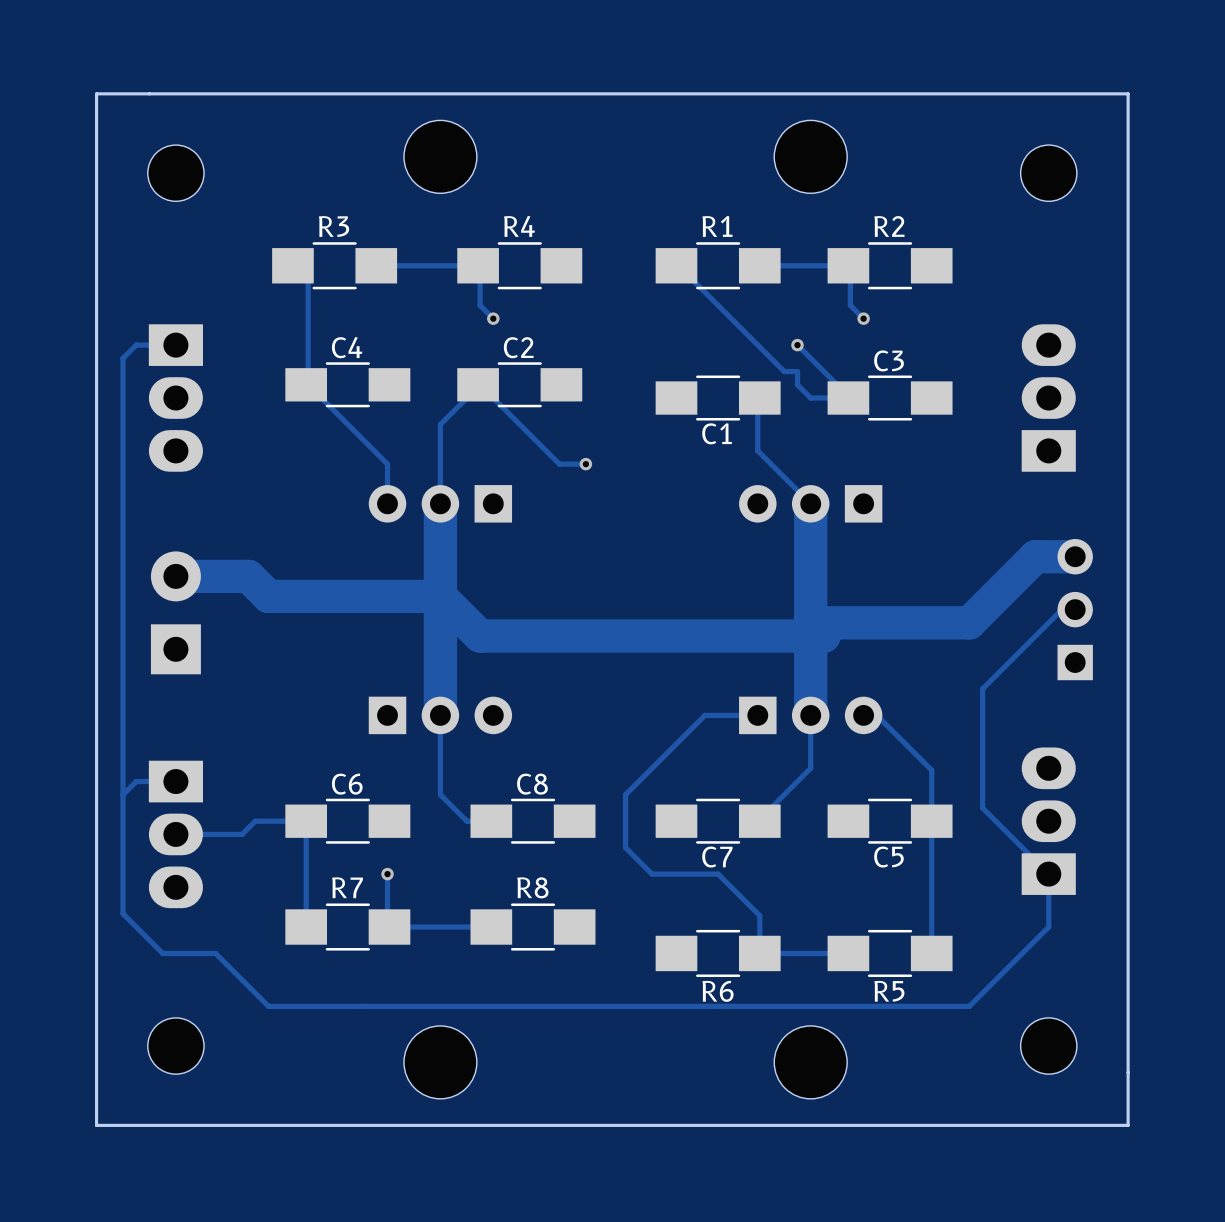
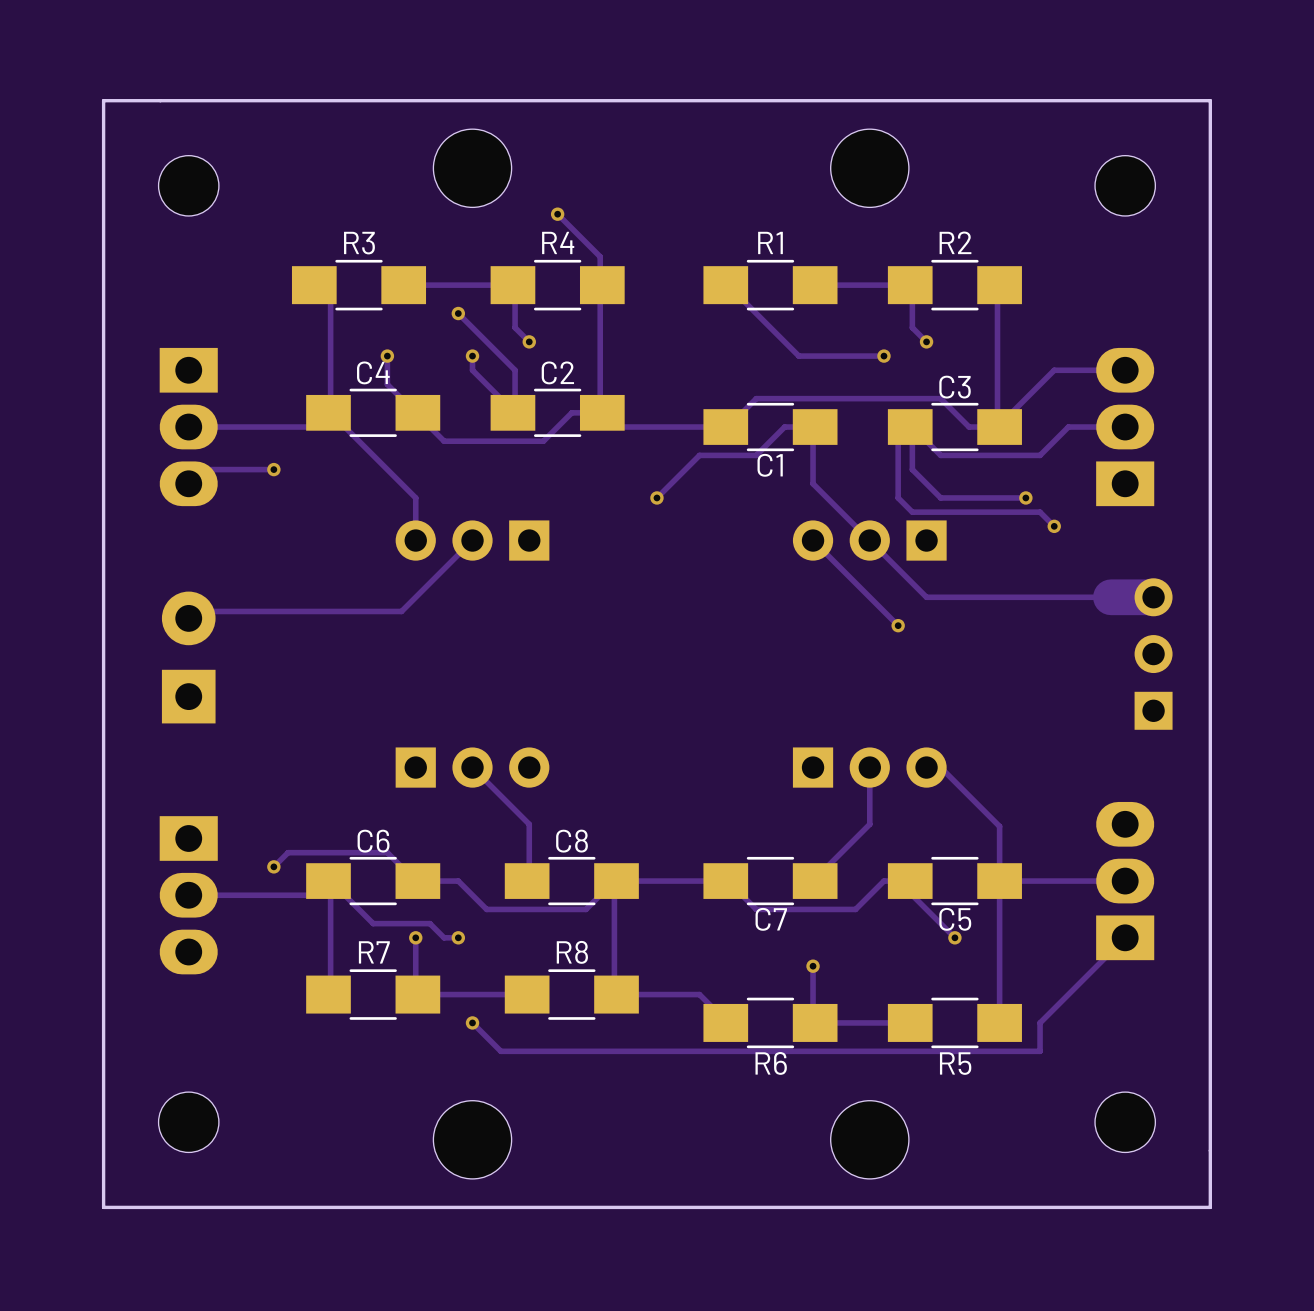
track: none -> (557, 214) (600, 256) (600, 412) (614, 427) (727, 427) (756, 398) (841, 398)
via: none -> (557, 214)
track: none -> (999, 285) (997, 285) (997, 427) (1054, 370) (1125, 370)
track: none -> (458, 313) (515, 370) (515, 412) (472, 370) (472, 356)
via: none -> (458, 313)
track: none -> (387, 356) (387, 384) (444, 441) (543, 441) (571, 412) (602, 412)
via: none -> (387, 356)
via: none -> (472, 356)
track: (744, 331) (784, 371) -> (798, 356) (883, 356)
track: (175, 345) (136, 345) (123, 358) (123, 913) (162, 953) (215, 953) (268, 1006) (969, 1006) (1048, 927) (1048, 874) (982, 807) (982, 688) (1061, 609) (1075, 609) -> none
track: (797, 345) (850, 398) -> (1025, 497) (940, 497) (912, 469) (912, 427)
via position: (797, 345) -> (883, 356)
track: (797, 371) (797, 384) (810, 398) (848, 398) -> (855, 398) (940, 398) (969, 427) (999, 427)
track: none -> (330, 412) (316, 427) (188, 427)
track: none -> (813, 427) (784, 427) (756, 455) (699, 455) (656, 497)
track: none -> (912, 427) (898, 441) (898, 497) (912, 512) (1040, 512) (1054, 526)
track: none -> (1125, 427) (1068, 427) (1040, 455) (940, 455) (912, 427)
track: none -> (273, 469) (202, 469) (188, 483)
via: none -> (273, 469)
track: (585, 464) (559, 464) (480, 384) (440, 424) (440, 794) (466, 821) (491, 821) -> (472, 767) (529, 824) (529, 881) (527, 881)
via position: (585, 464) -> (656, 497)
via: none -> (1025, 497)
via: none -> (1054, 526)
track: none -> (813, 540) (898, 625)
track: (810, 503) (810, 715) -> (869, 540) (926, 597) (1111, 597)
track: (1035, 556) (969, 622) (810, 622) (823, 636) (480, 636) (440, 596) (268, 596) (248, 576) (175, 576) -> (472, 540) (401, 611) (188, 611) (188, 618)
via: none -> (898, 625)
track: (757, 715) (704, 715) (625, 794) (625, 847) (652, 874) (718, 874) (759, 915) (759, 953) -> (813, 966) (813, 1022) (815, 1022)
track: (175, 781) (136, 781) (123, 794) -> none
track: none -> (273, 866) (288, 852) (387, 852) (415, 881) (458, 881) (486, 909) (586, 909) (614, 881)
via: none -> (273, 866)
track: none -> (330, 881) (316, 895) (259, 895)
track: none -> (330, 881) (373, 923) (429, 923) (444, 937) (458, 937)
track: none -> (614, 881) (727, 881) (756, 909) (855, 909) (883, 881) (912, 881) (912, 895) (954, 937)
track: none -> (614, 881) (614, 994) (699, 994) (727, 1022) (725, 1022)
track: none -> (1125, 881) (997, 881)
track: (242, 834) (255, 821) (306, 821) (306, 927) -> (330, 881) (330, 994) (328, 994)
via: none -> (458, 937)
via: none -> (954, 937)
track: none -> (1125, 937) (1040, 1022) (1040, 1051) (500, 1051) (472, 1022)
via: none -> (813, 966)
via: none -> (472, 1022)

